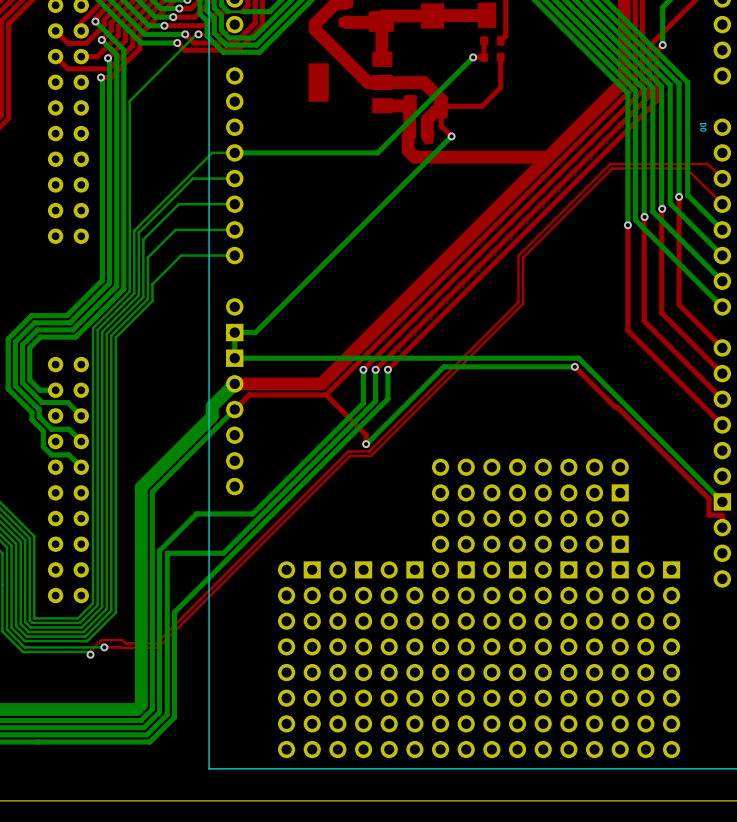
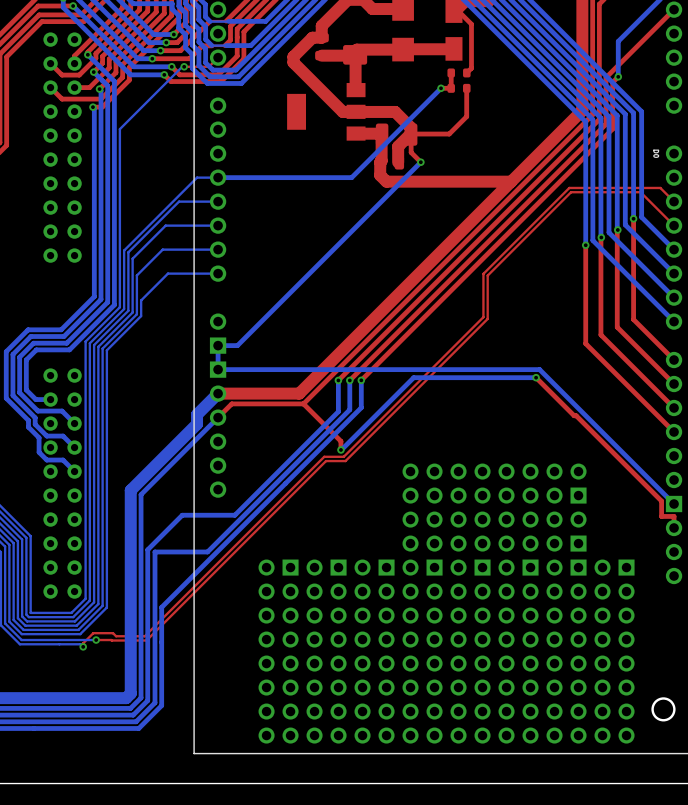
round board edge: none -> [651, 697, 676, 722]

